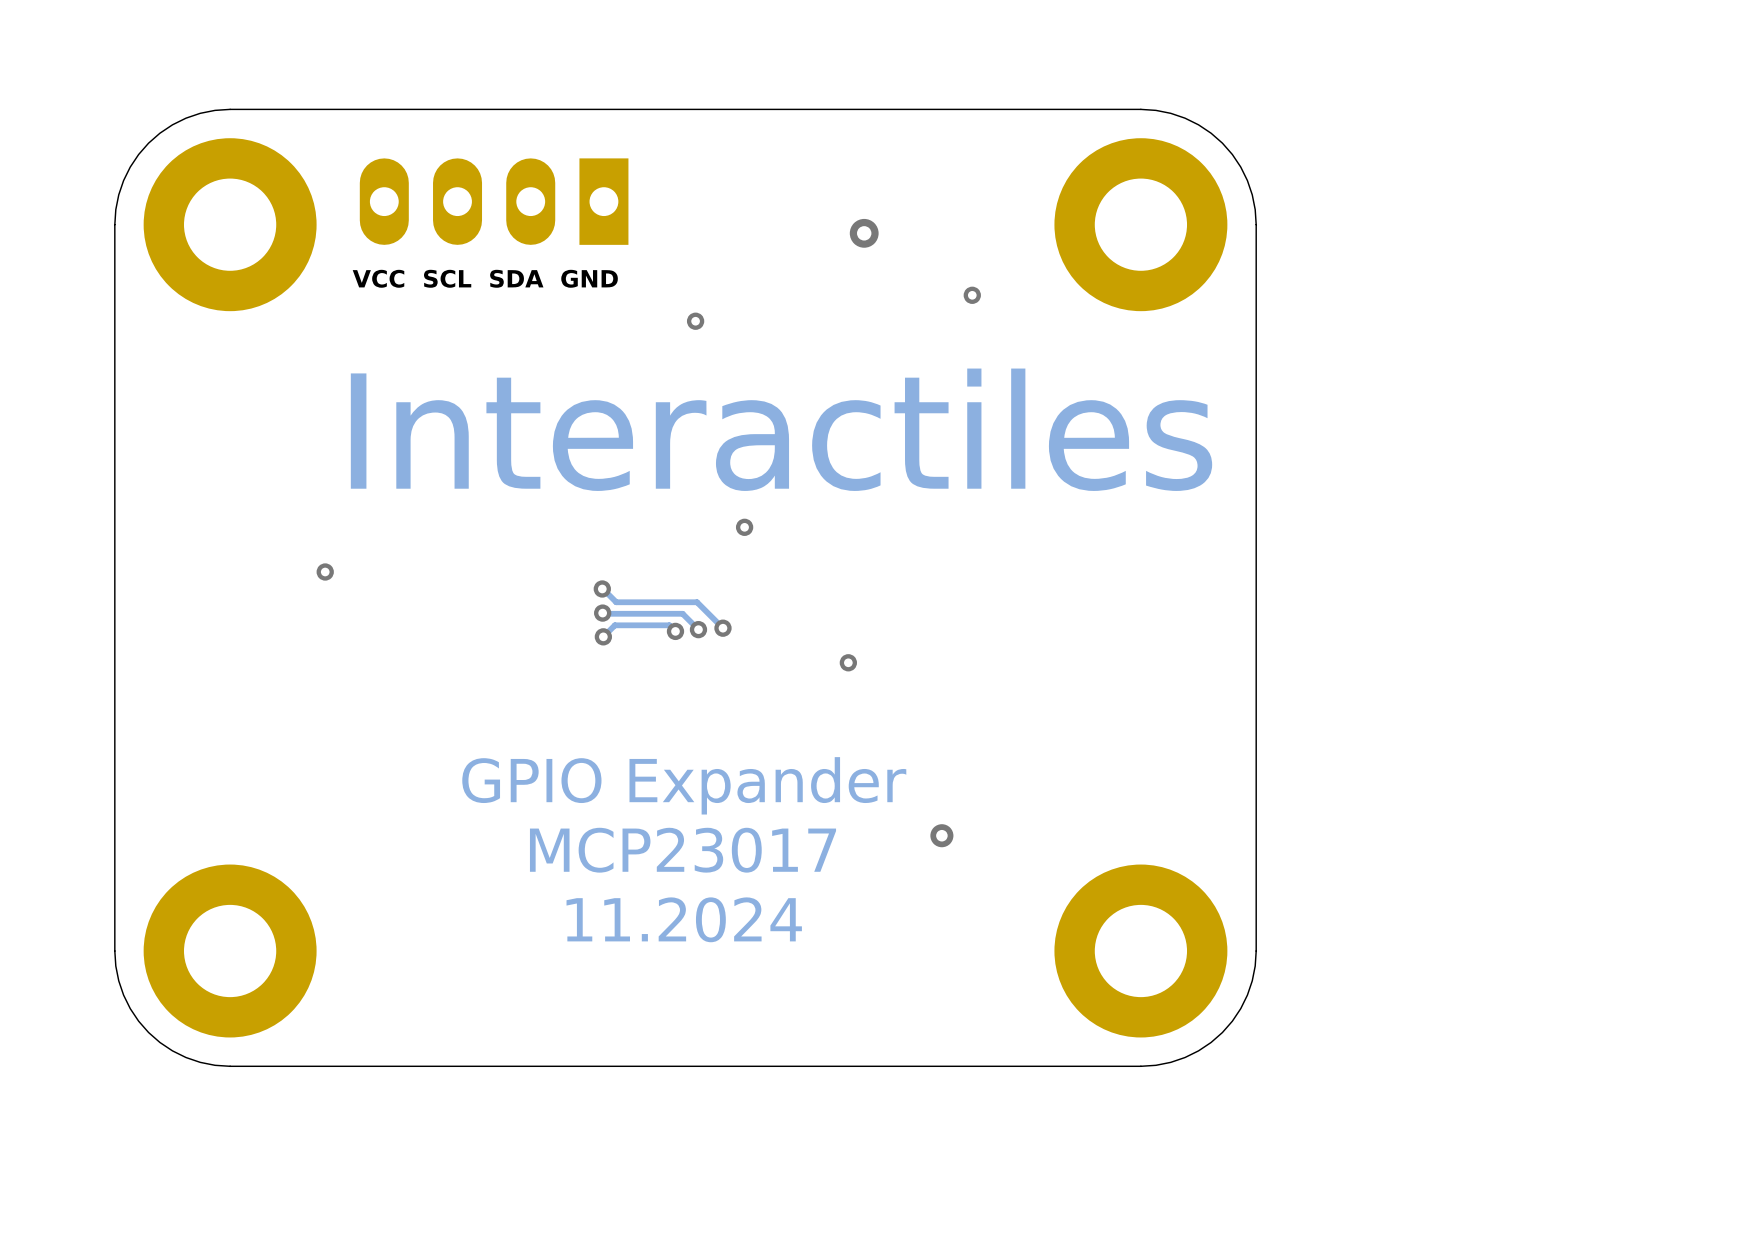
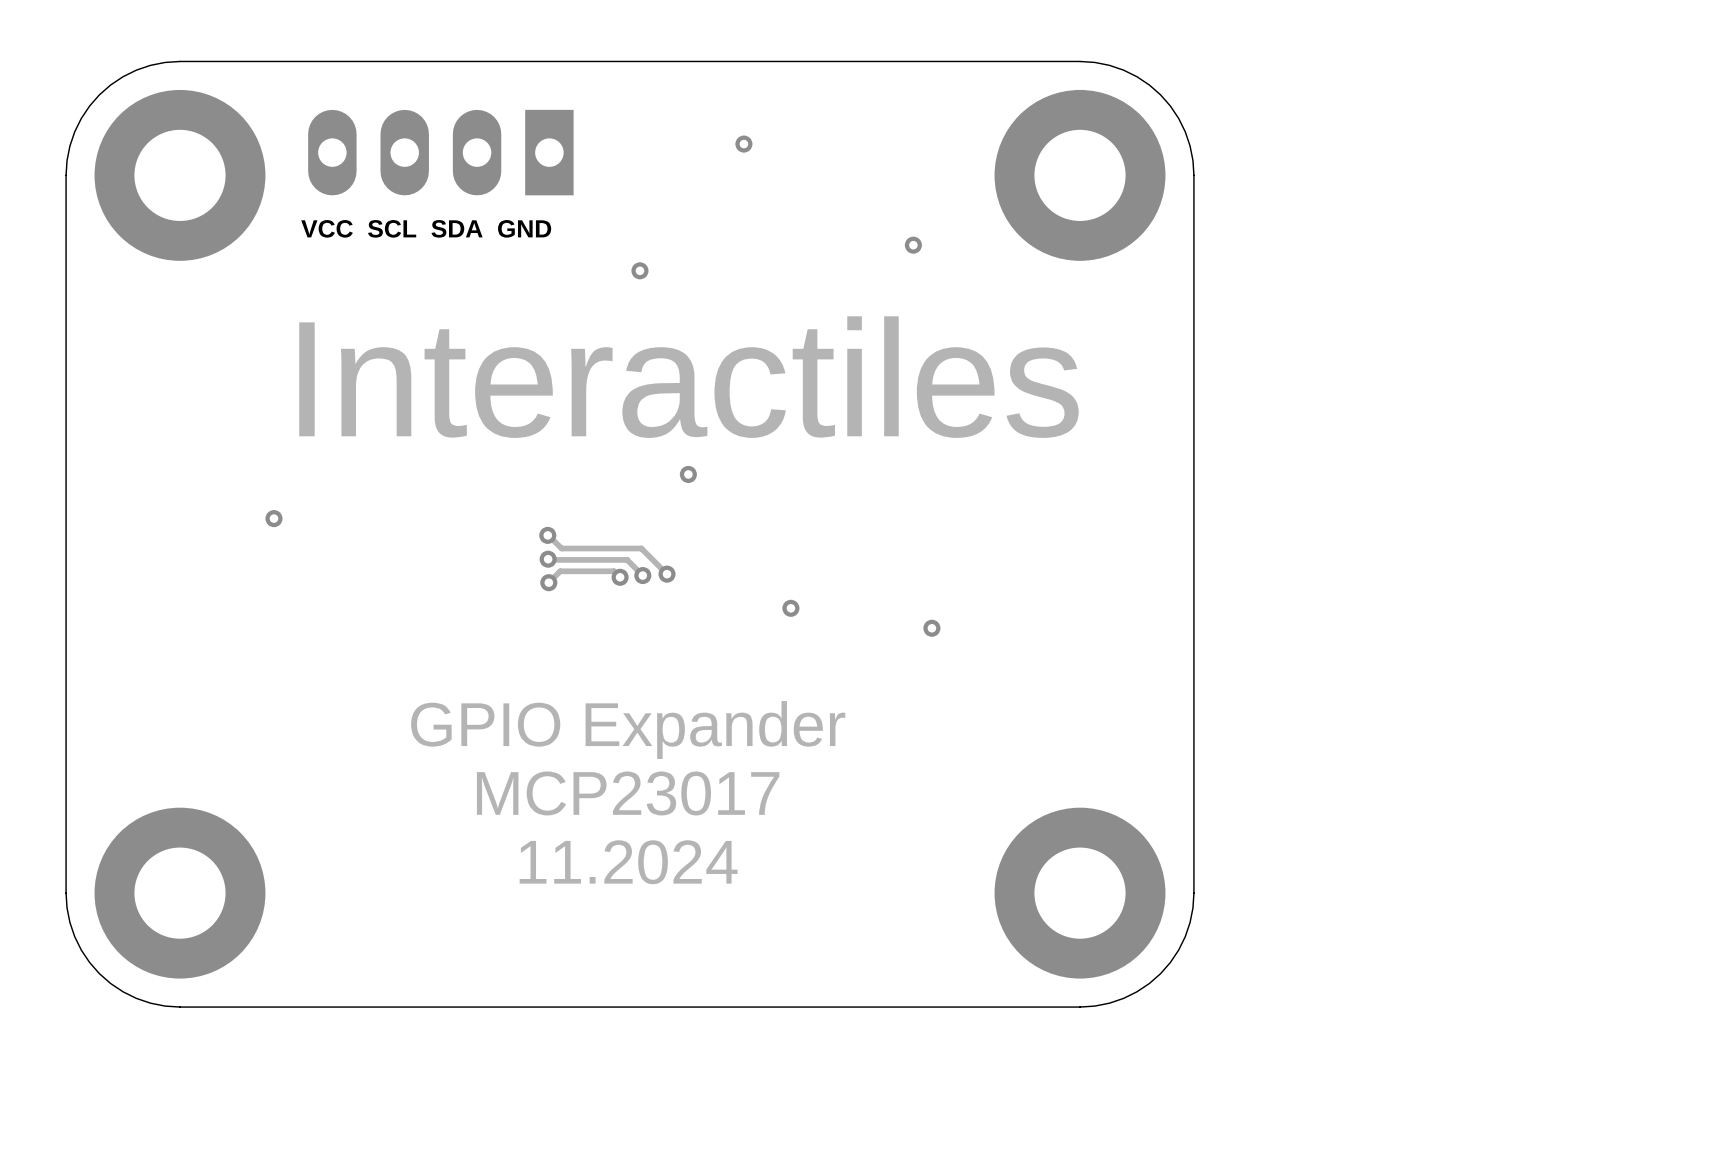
via: none -> (743, 144)
via: (864, 233) -> none
via: none -> (931, 628)
via: (941, 835) -> none

